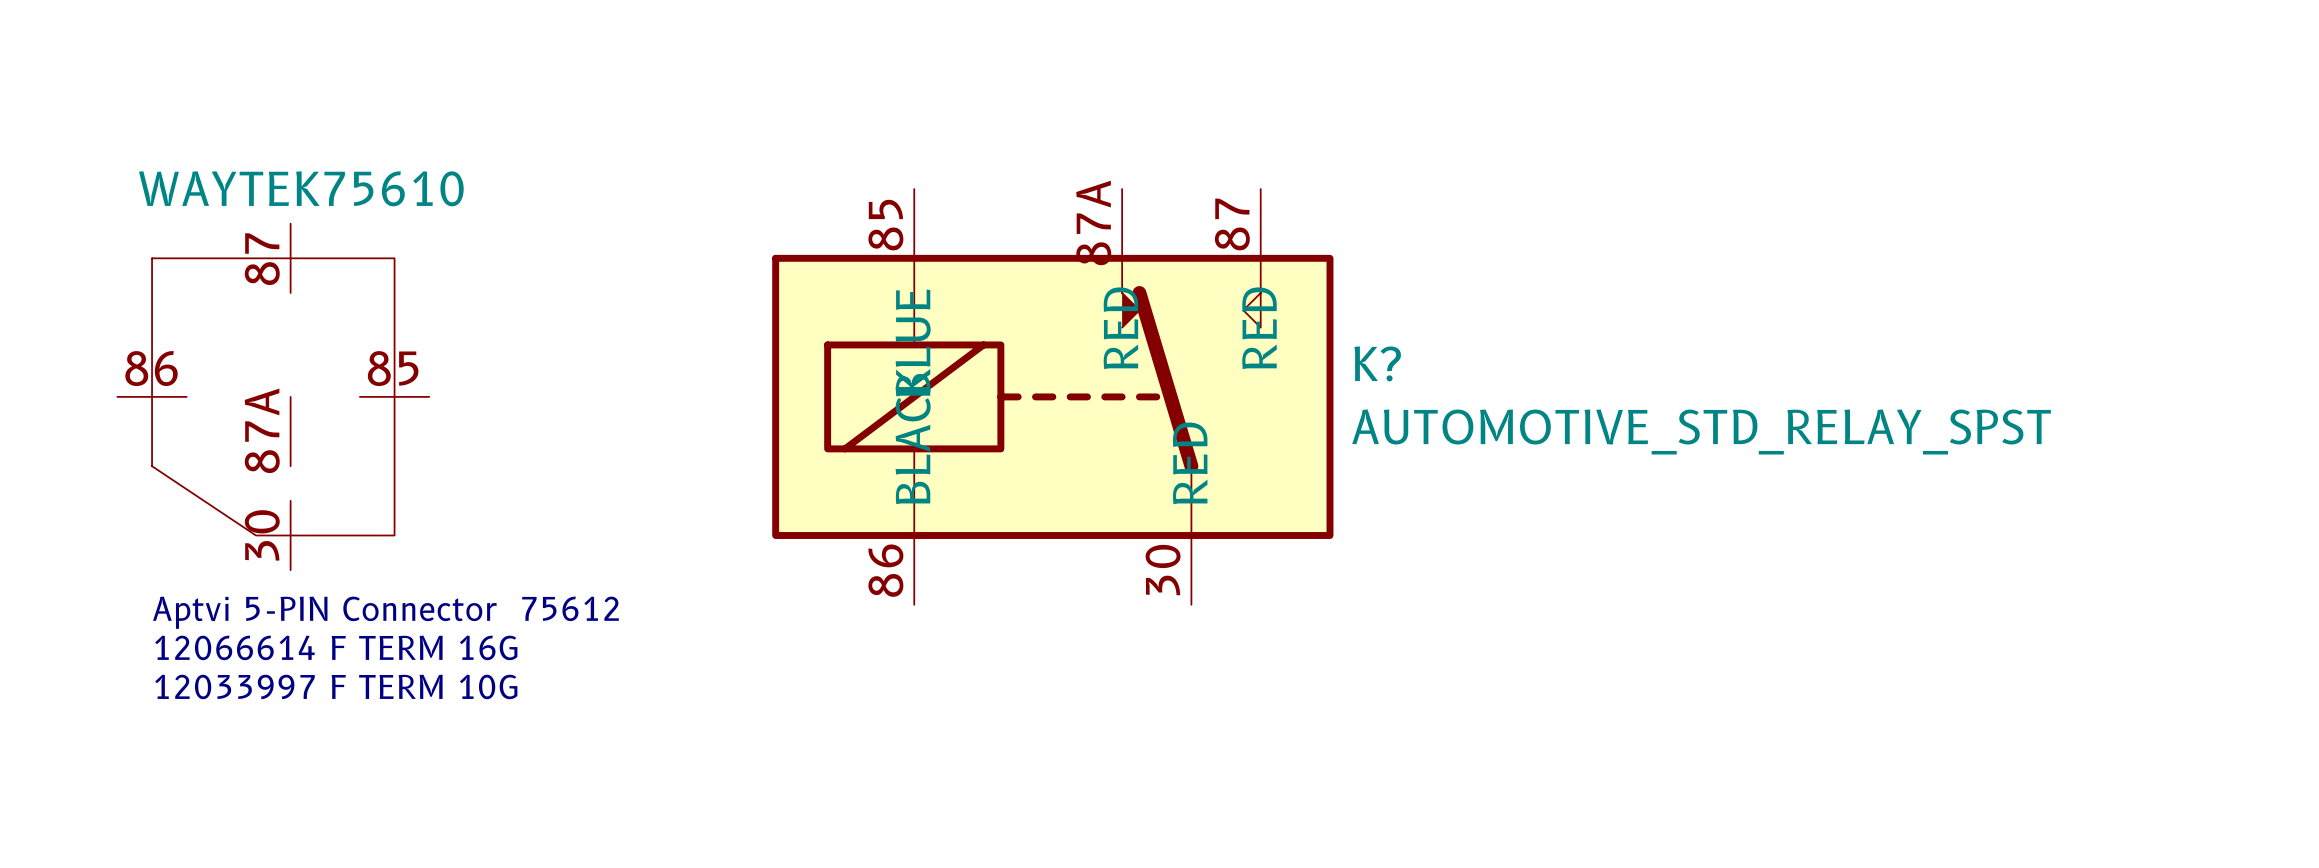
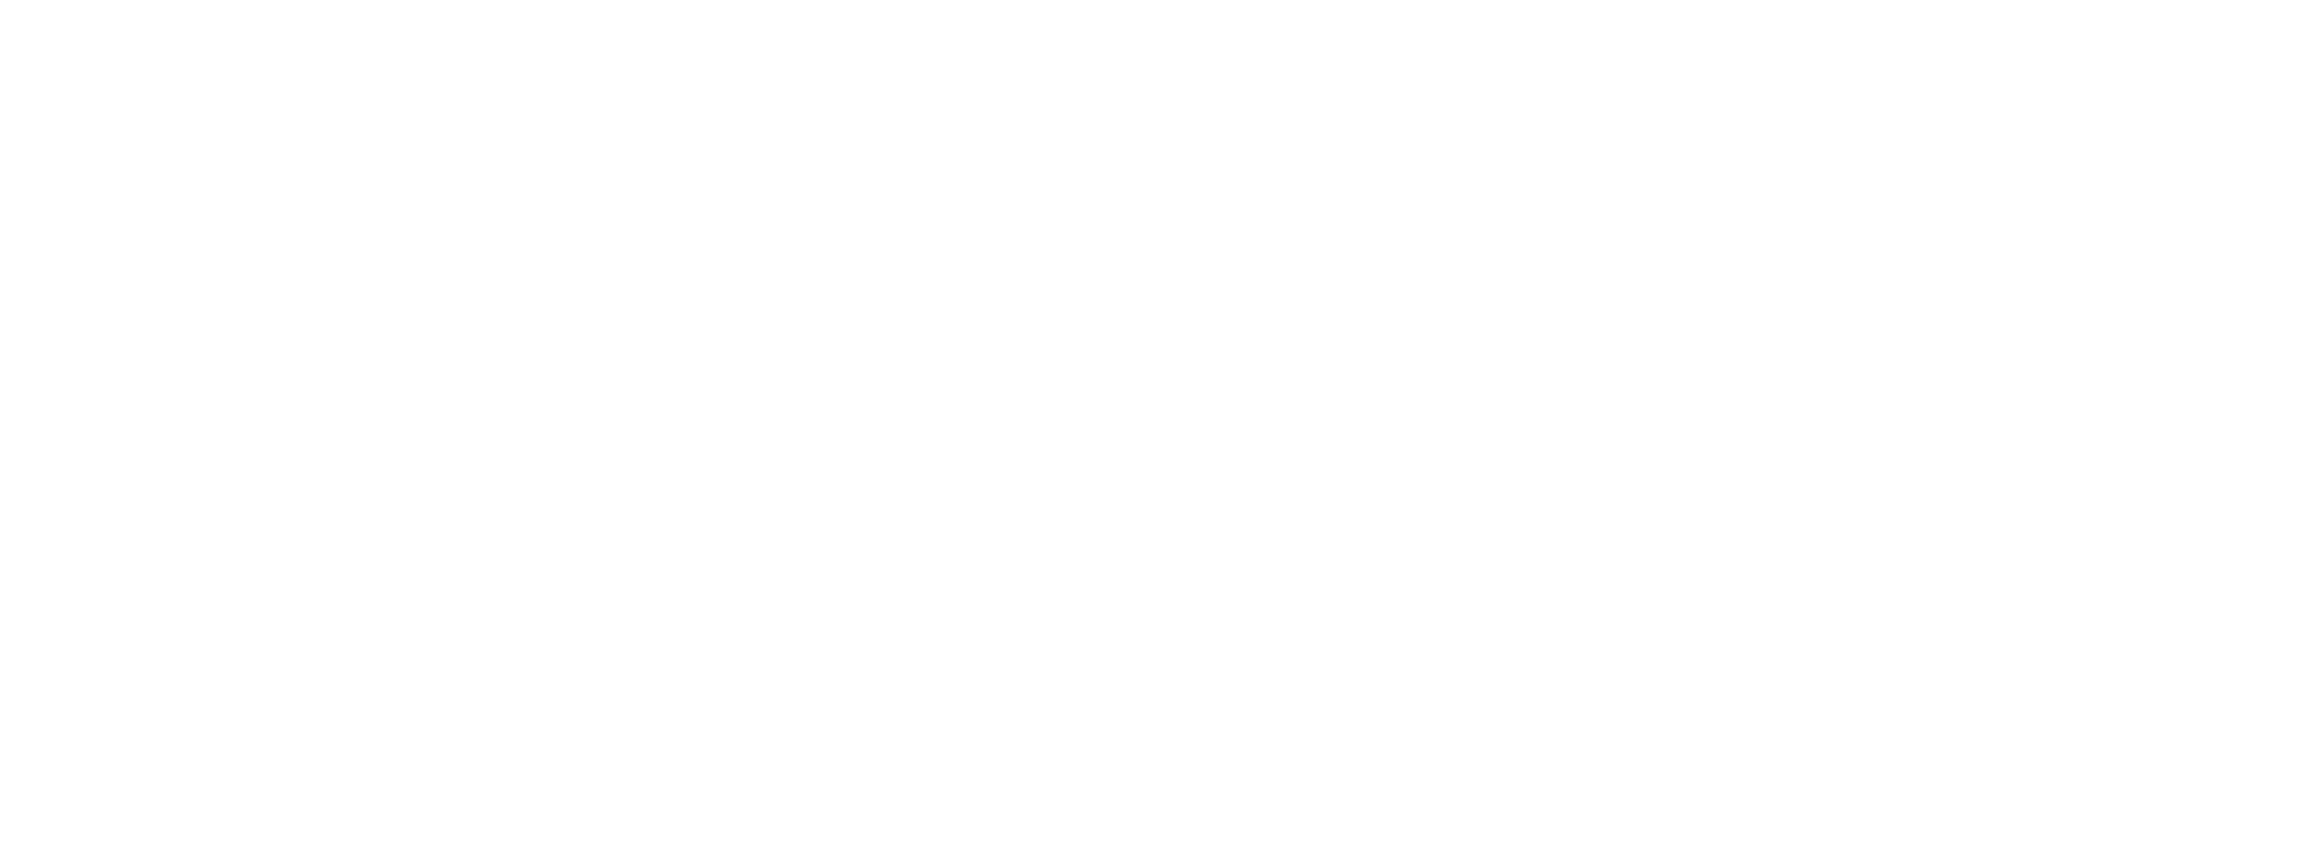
part: WAYTEK75610 (273, 396) -> none
K?: AUTOMOTIVE_STD_RELAY_SPST (1052, 396) -> none
text: Aptvi 5-PIN Connector 75612 (385, 612) -> none
text: 12066614 F TERM 16G (336, 647) -> none
text: 12033997 F TERM 10G (336, 686) -> none

